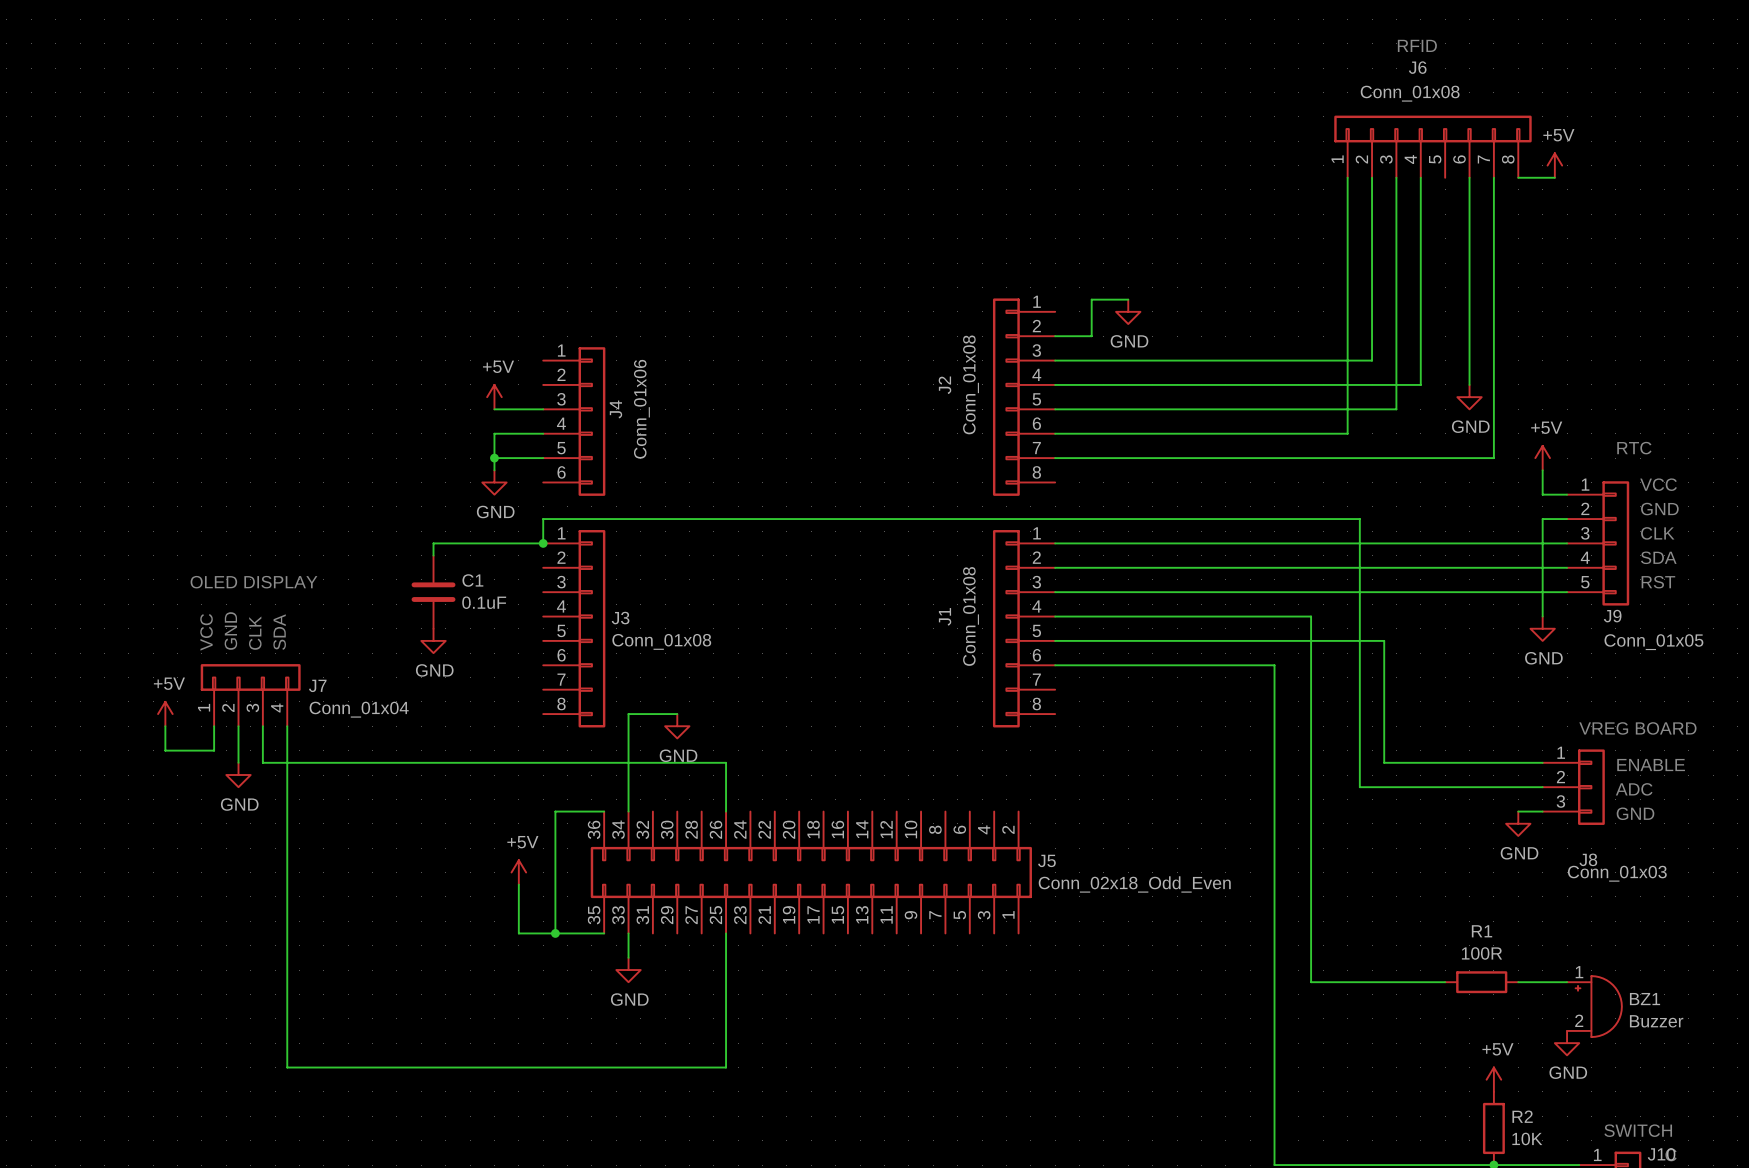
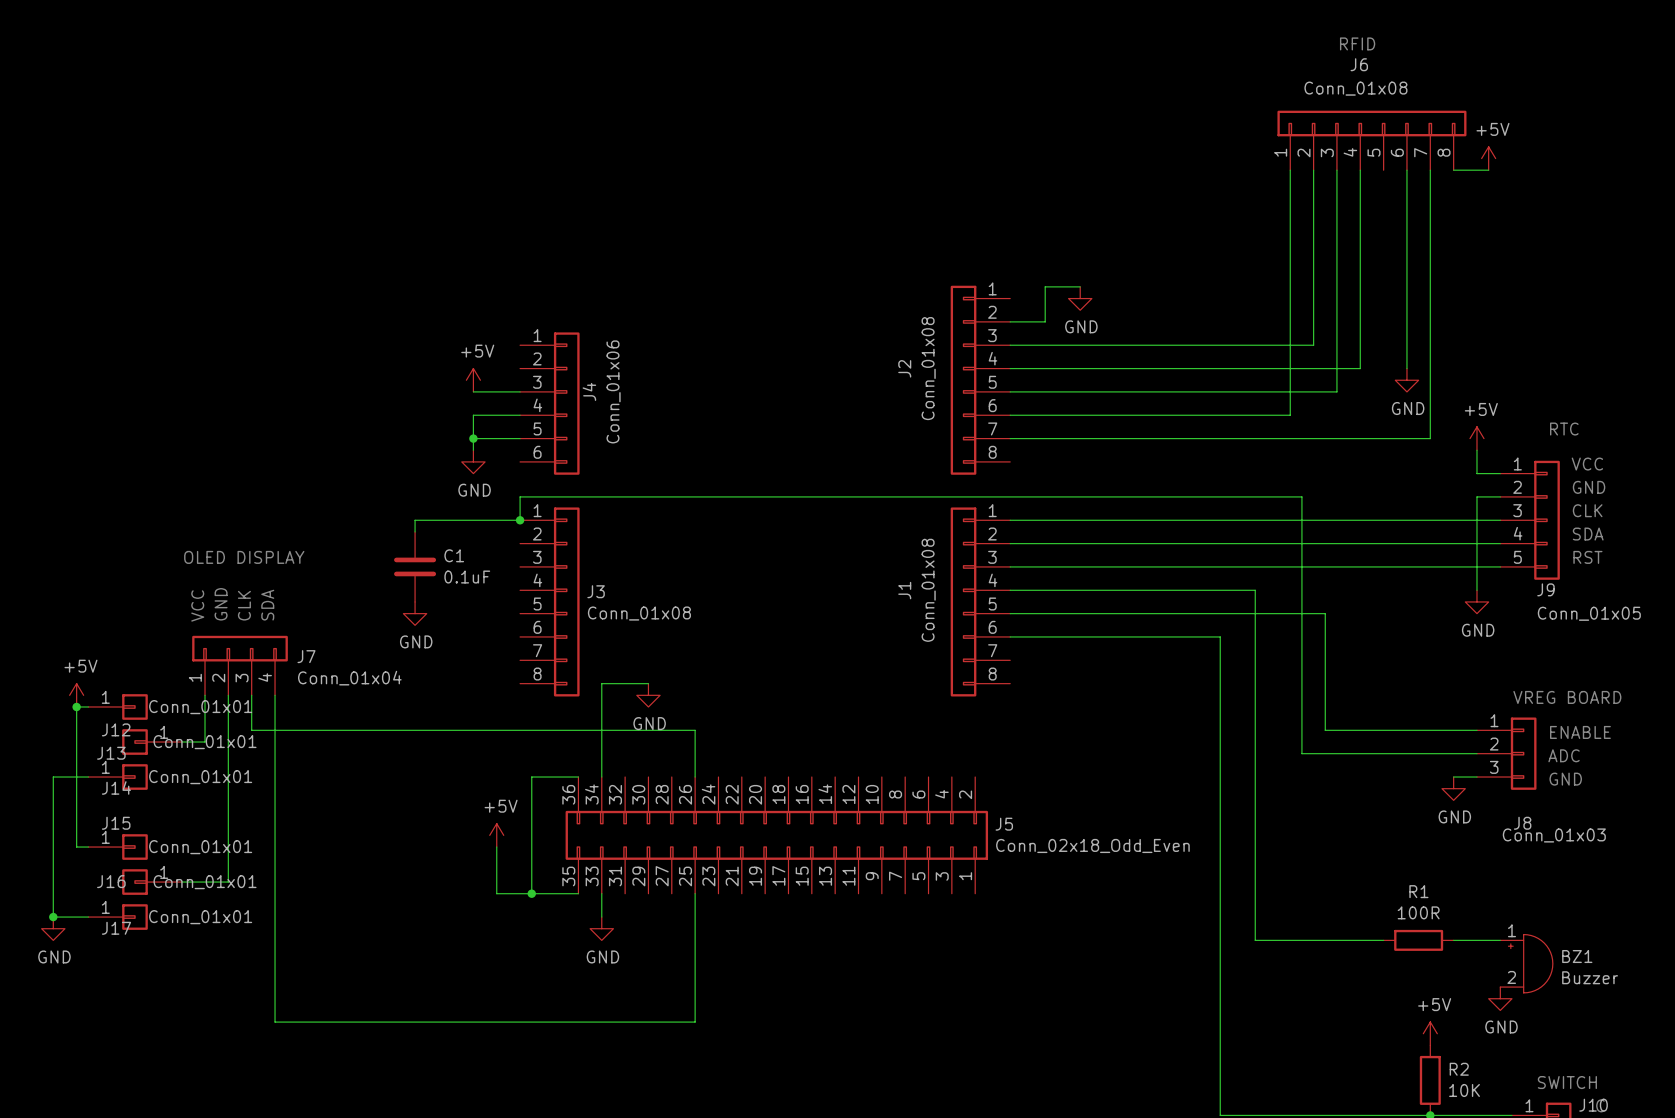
power symbol position: +5V (165, 714) -> +5V (76, 695)
wire: (165, 726) (165, 750) (214, 750) -> (181, 742) (205, 742) (205, 718)
junction: none -> (76, 706)
wire: none -> (88, 706) (76, 706) (76, 847) (88, 847)
J12: none -> Conn_01x01 (118, 706)
wire: none -> (228, 730) (228, 882) (181, 882)
J13: none -> Conn_01x01 (151, 742)
power symbol: GND (238, 775) -> none
wire: none -> (88, 777) (53, 777) (53, 917) (88, 917)
J14: none -> Conn_01x01 (118, 777)
J15: none -> Conn_01x01 (118, 847)
J16: none -> Conn_01x01 (151, 882)
junction: none -> (53, 917)
J17: none -> Conn_01x01 (118, 917)
power symbol: none -> GND (53, 928)

